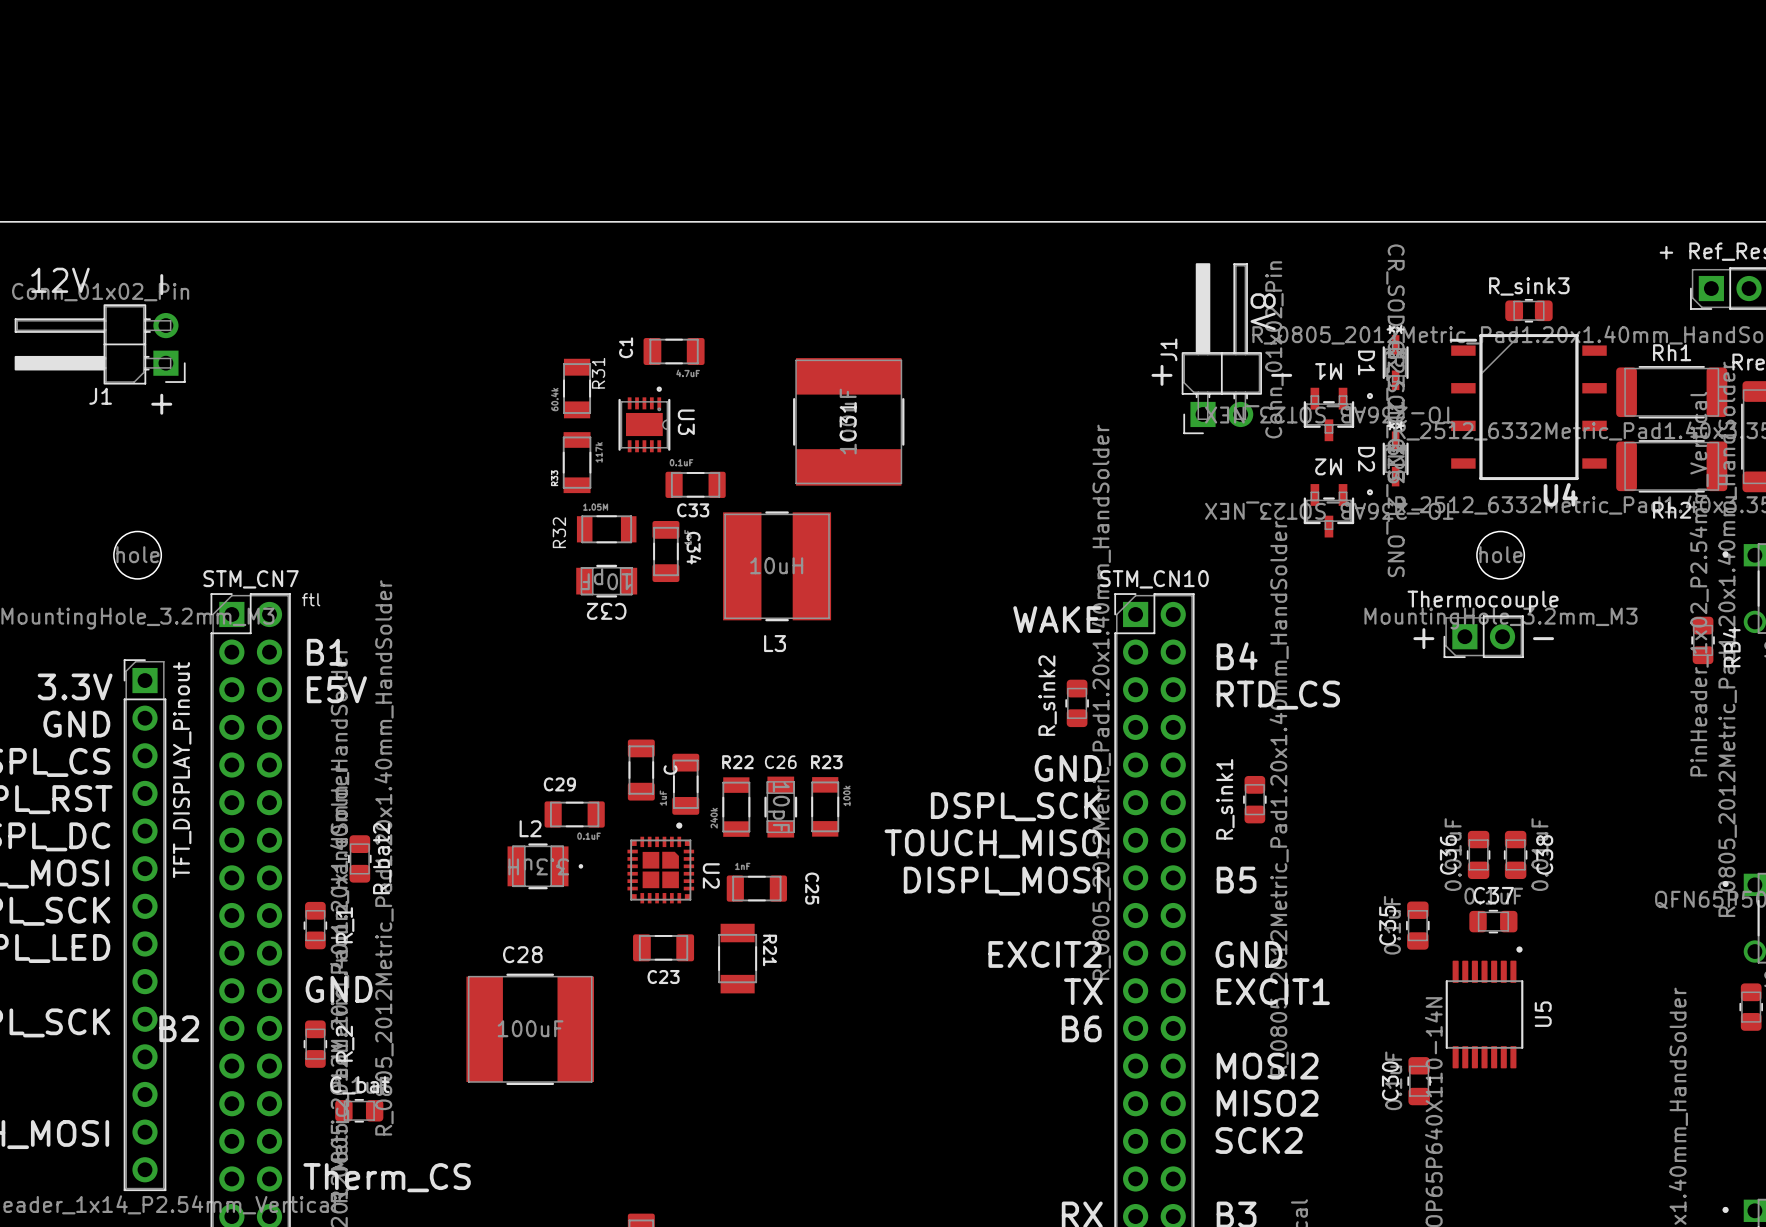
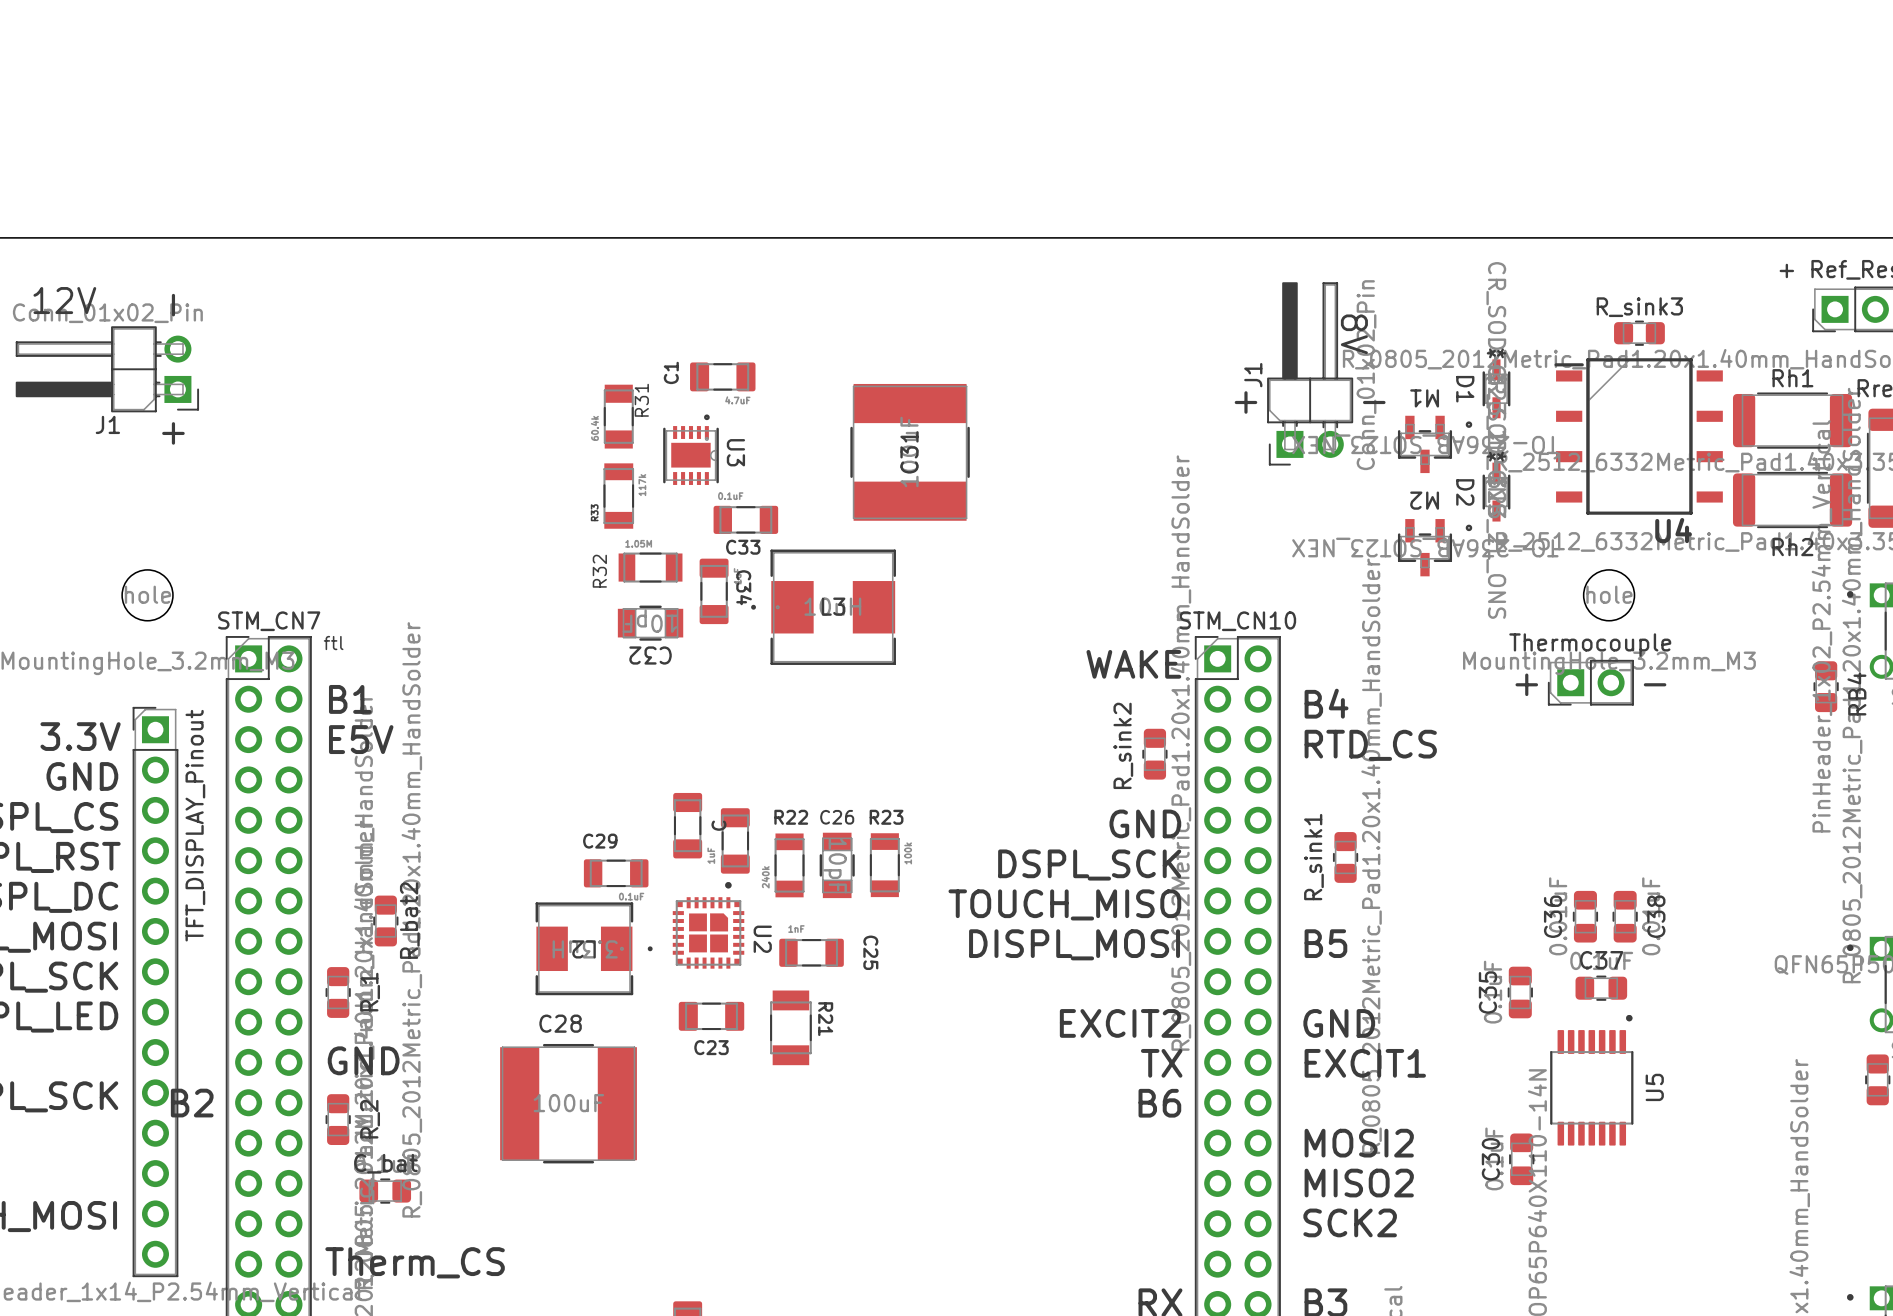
L3 footprint: [723, 511, 832, 622] -> [751, 549, 896, 665]
L3 name position: L3 (775, 643) -> L3 (833, 606)
L2 name position: L2 (530, 828) -> L2 (584, 949)
L2 footprint: [507, 843, 584, 890] -> [535, 902, 653, 996]

